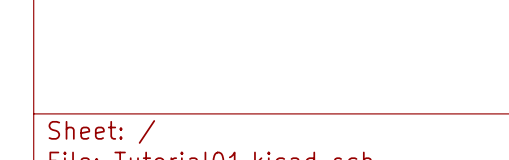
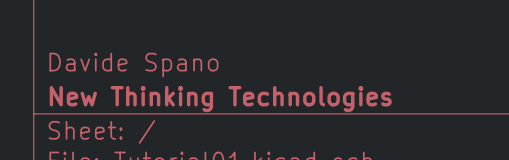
title block: none -> Davide Spano (133, 64)
title block: none -> New Thinking Technologies (220, 99)

